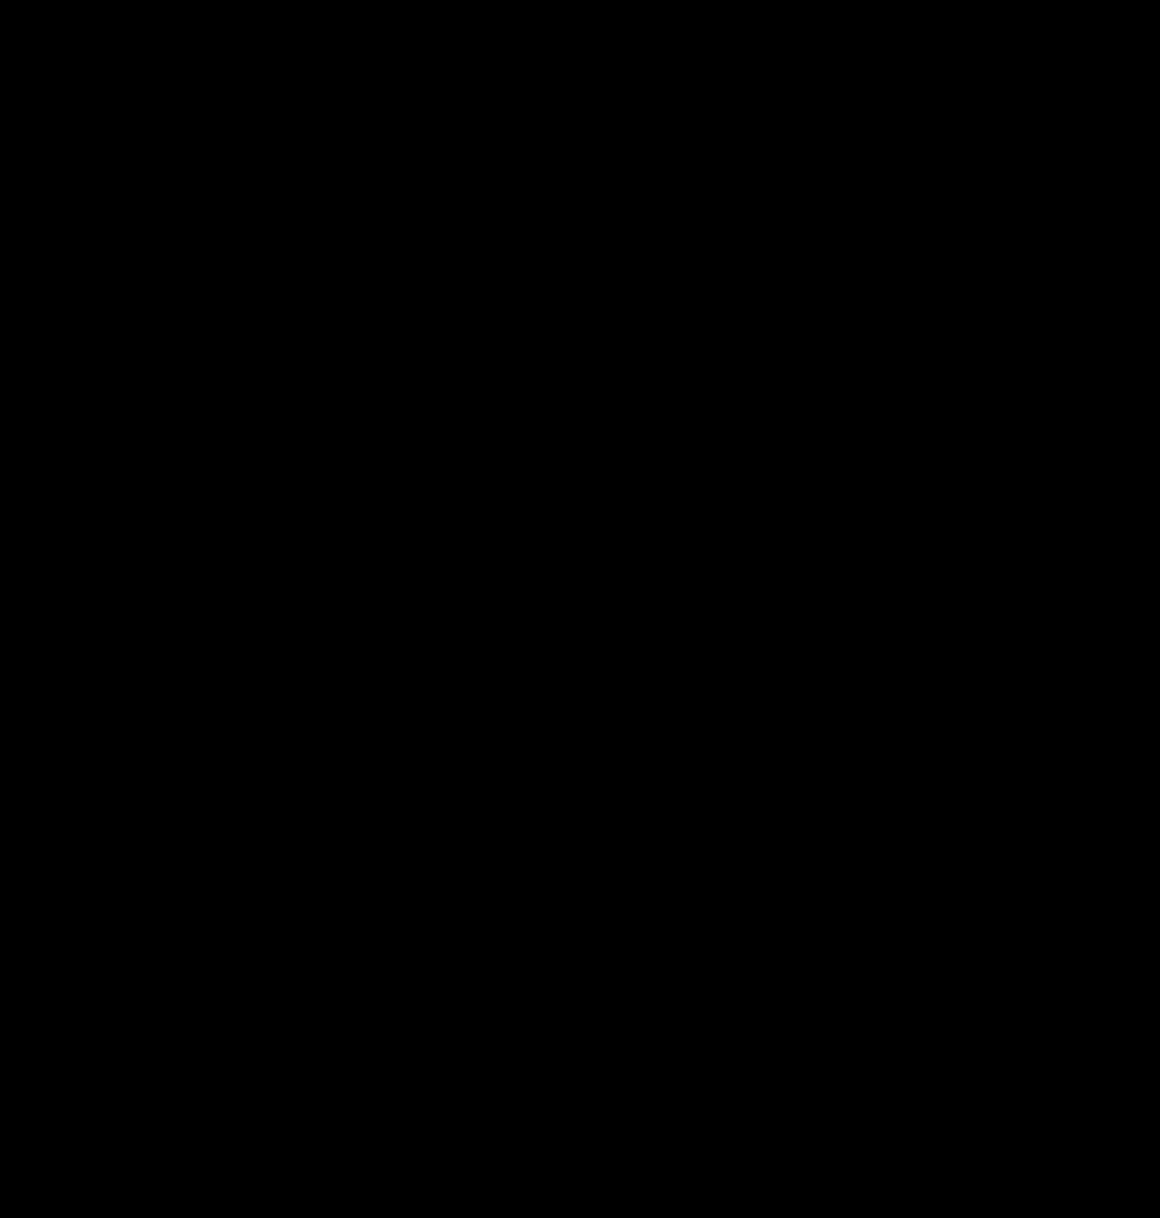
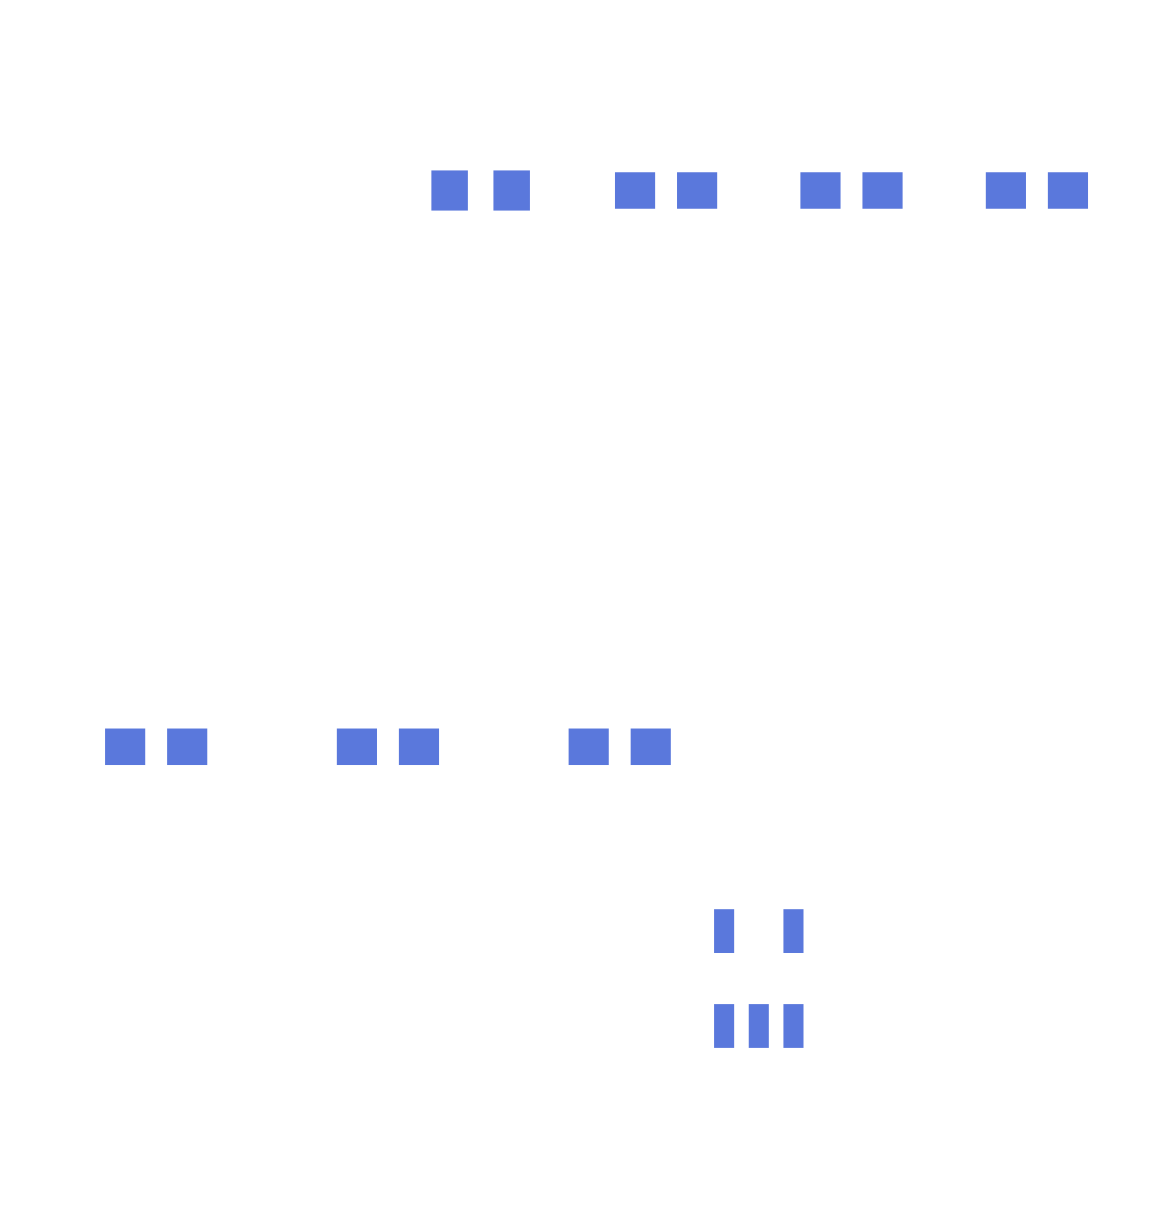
part: none -> (480, 190)
part: none -> (666, 190)
part: none -> (851, 190)
part: none -> (1036, 190)
part: none -> (156, 746)
part: none -> (387, 746)
part: none -> (619, 746)
part: none -> (758, 978)

